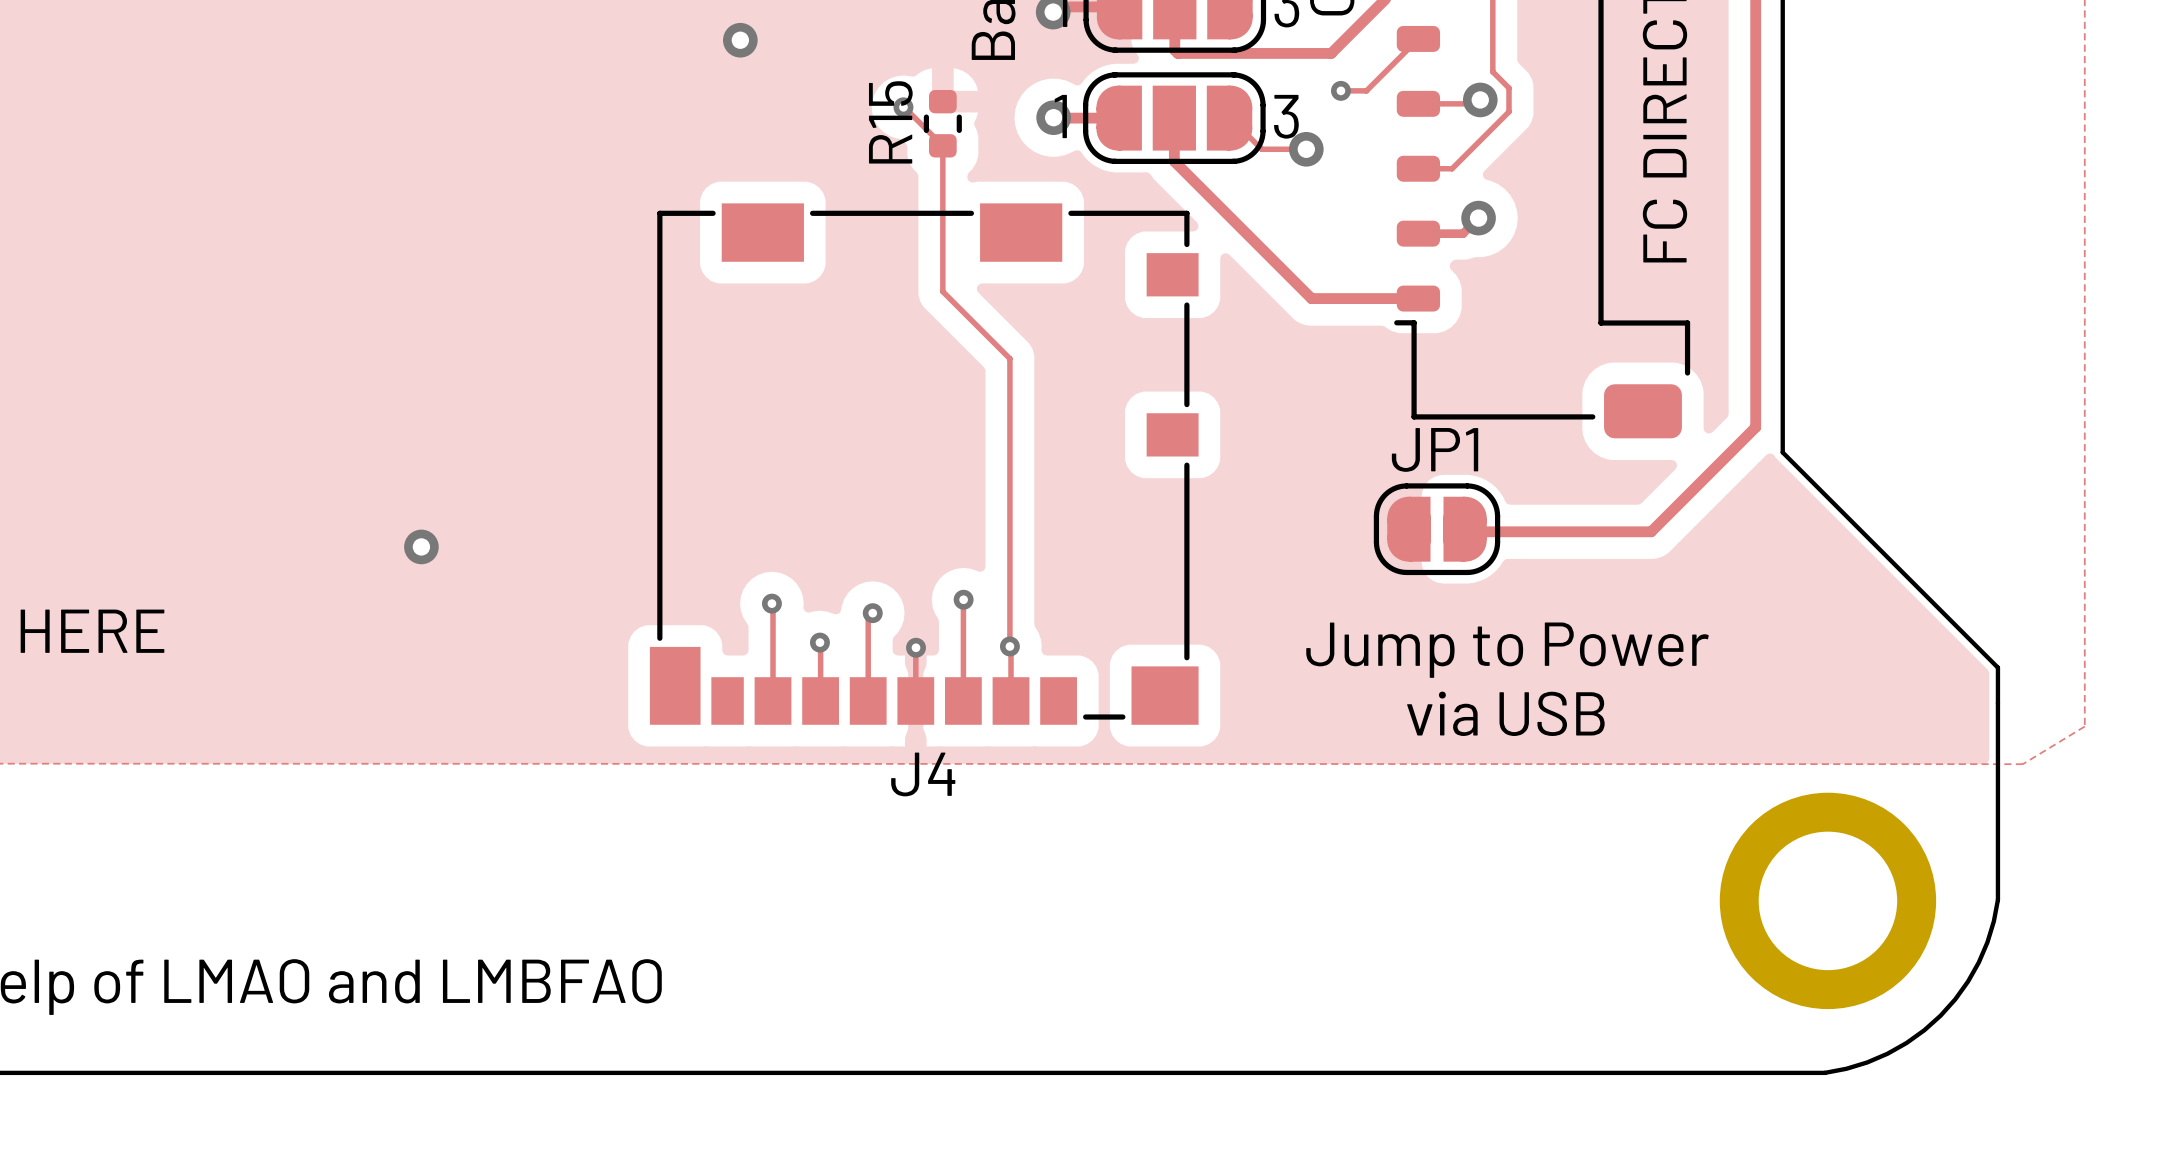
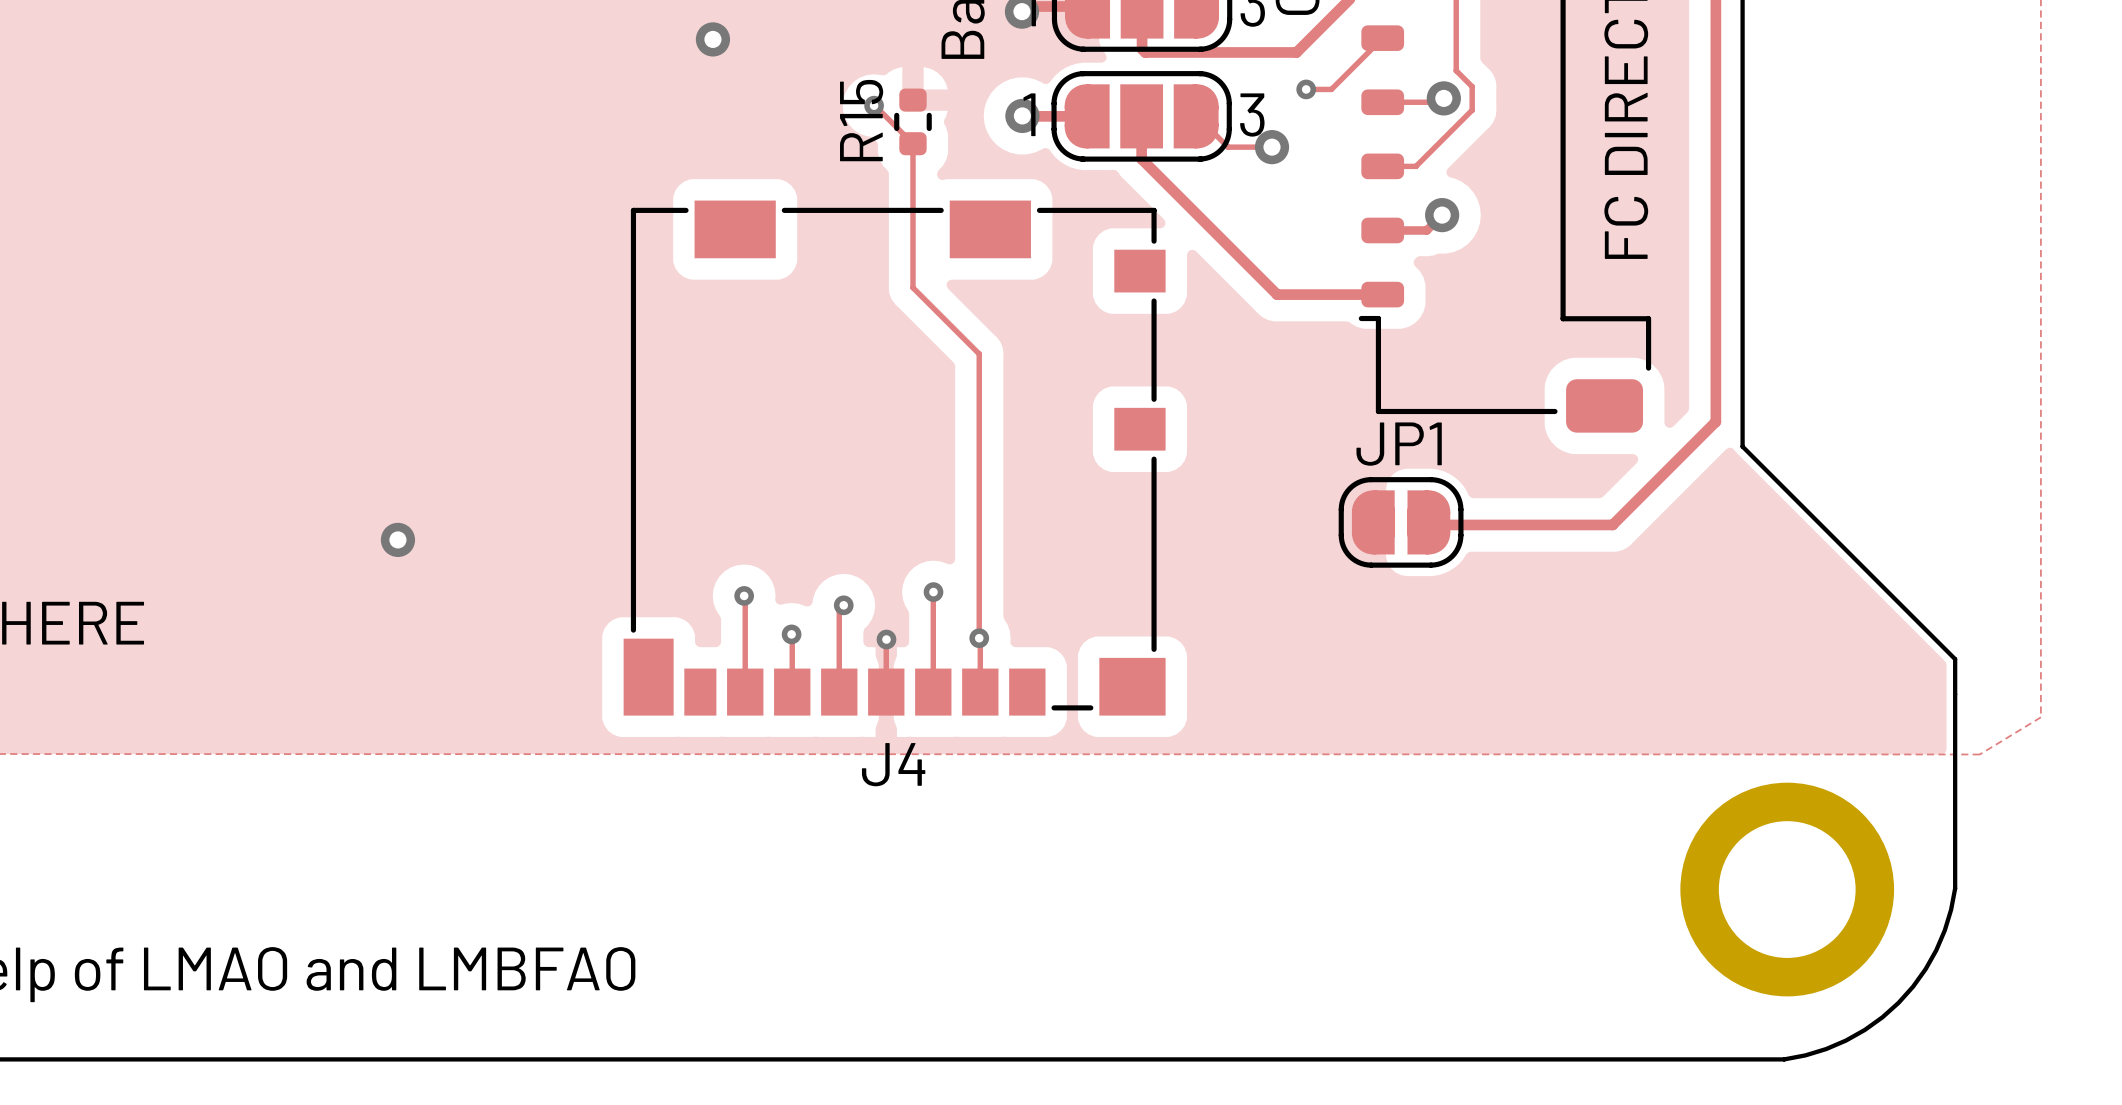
text: Jump to Power (1507, 650) -> none
text: via USB (1505, 713) -> none

